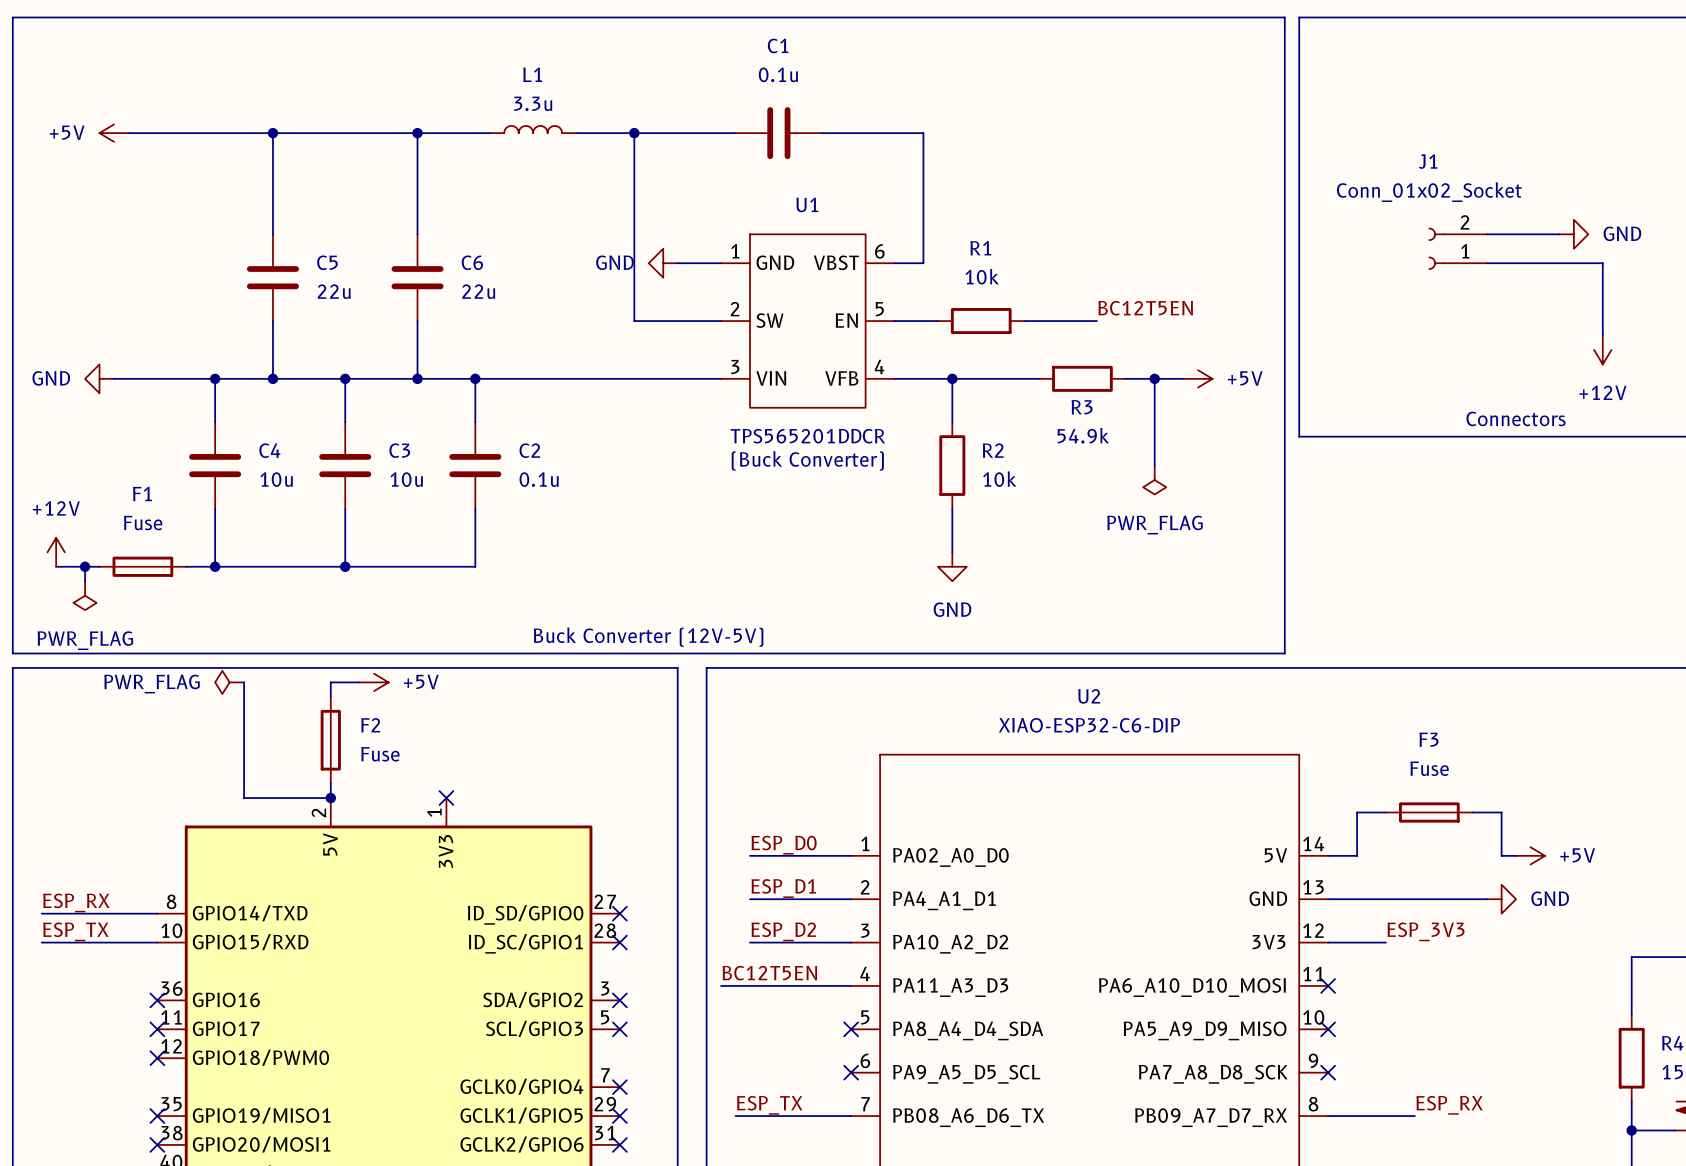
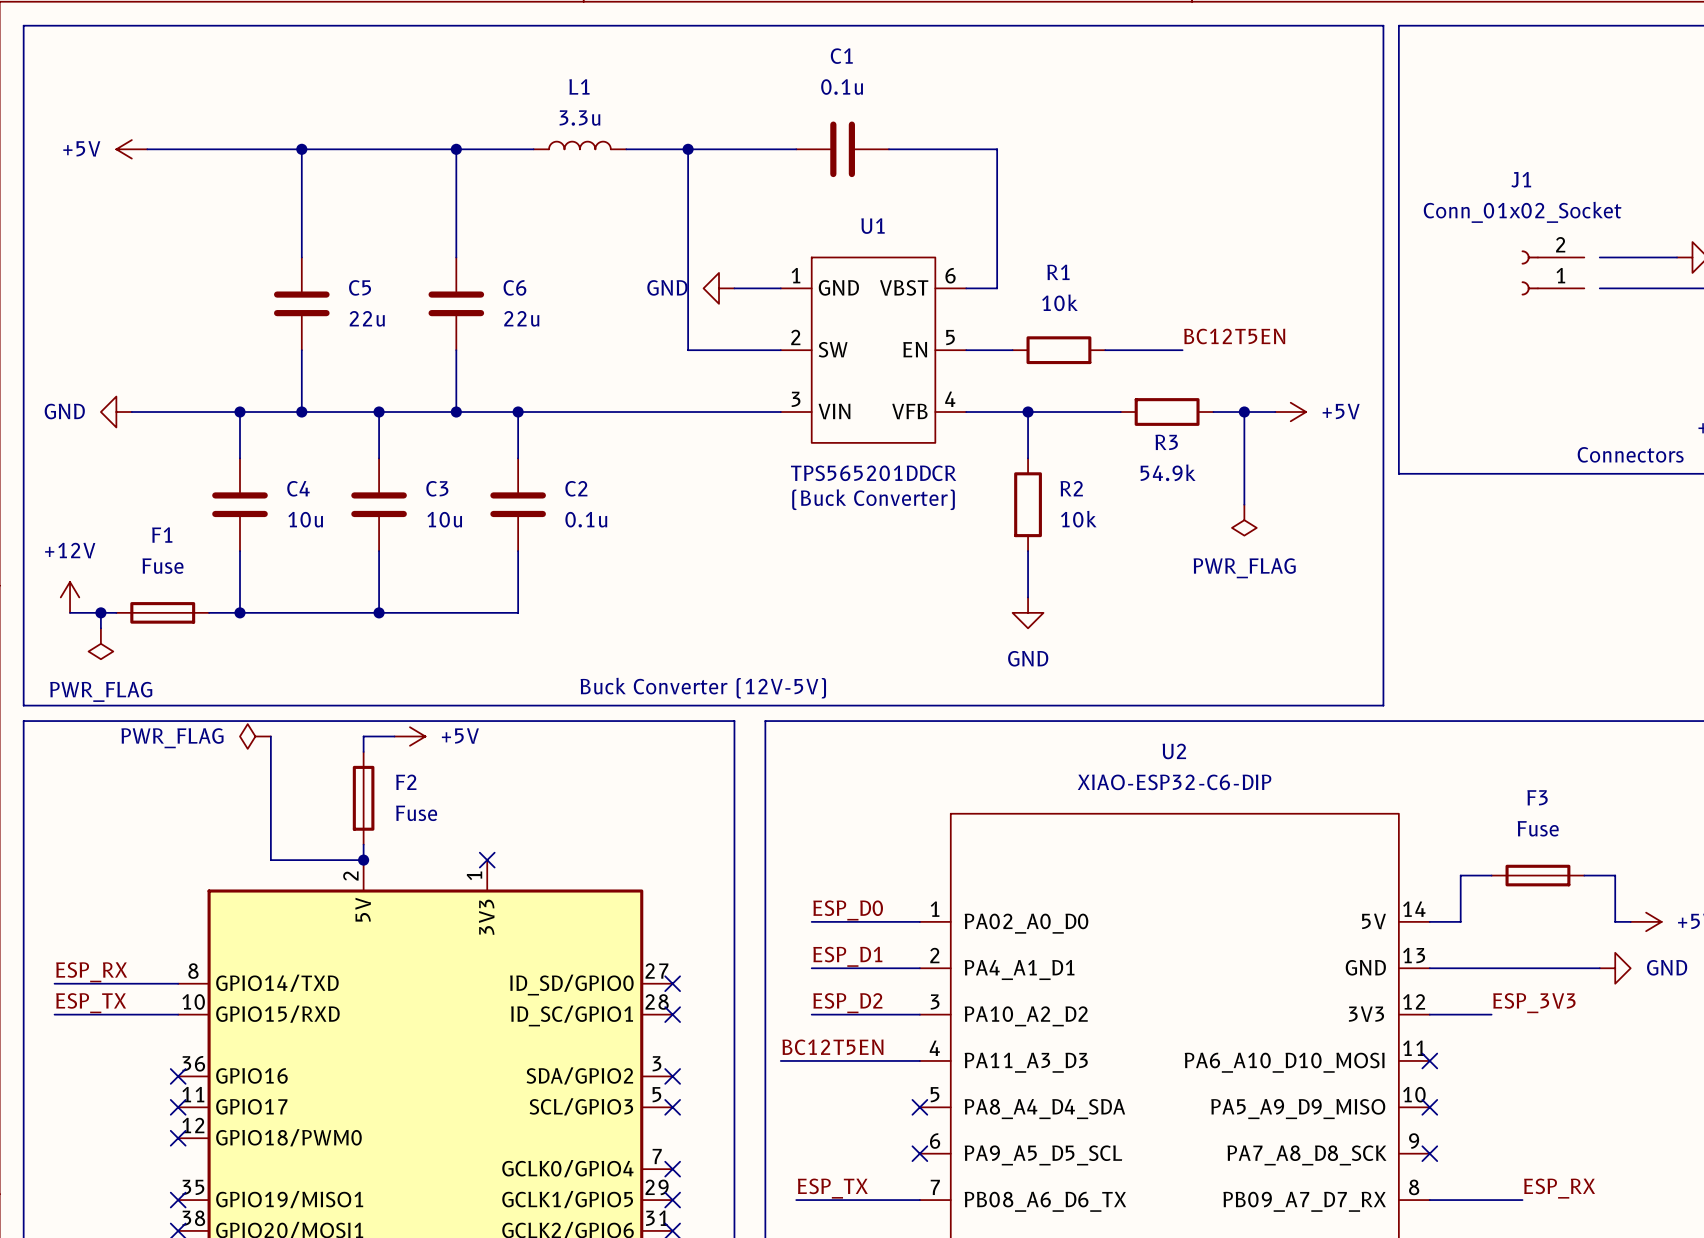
J1 position: (1457, 248) -> (1552, 272)

